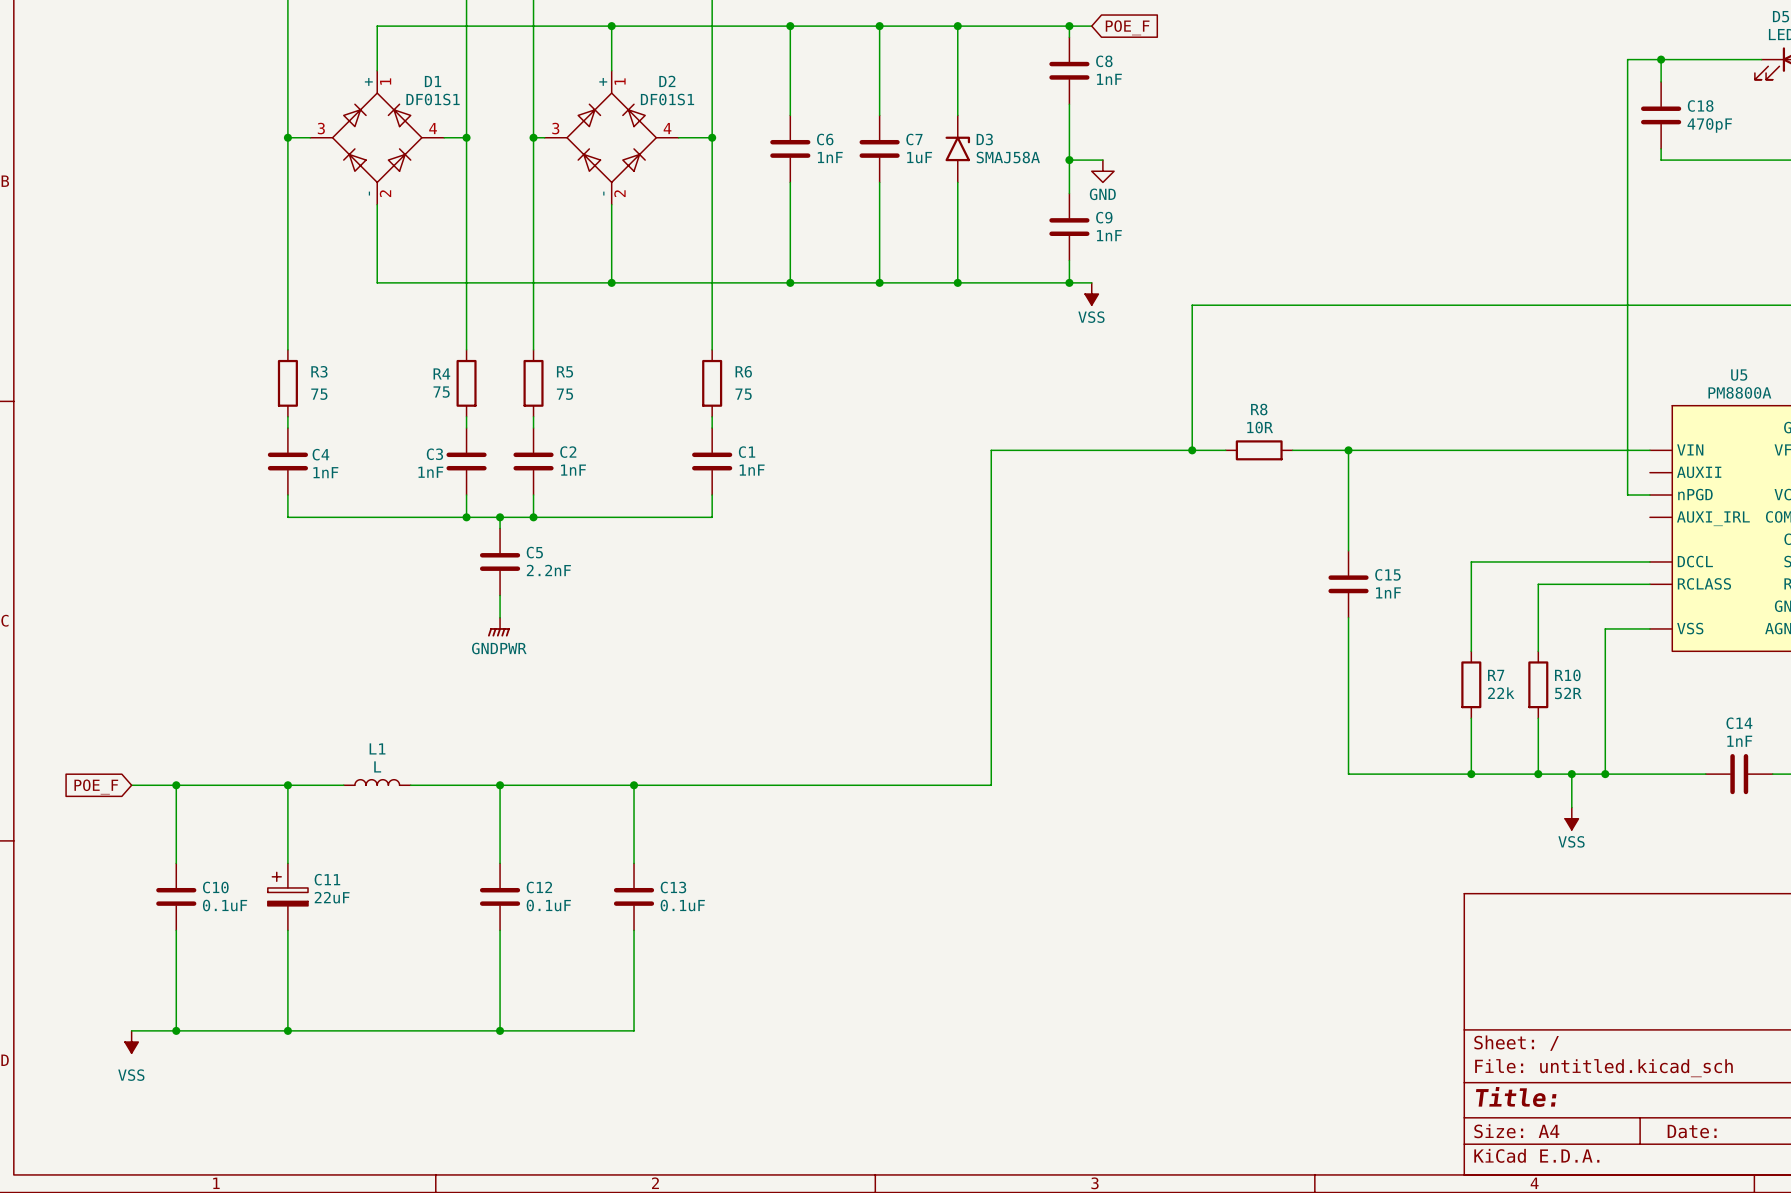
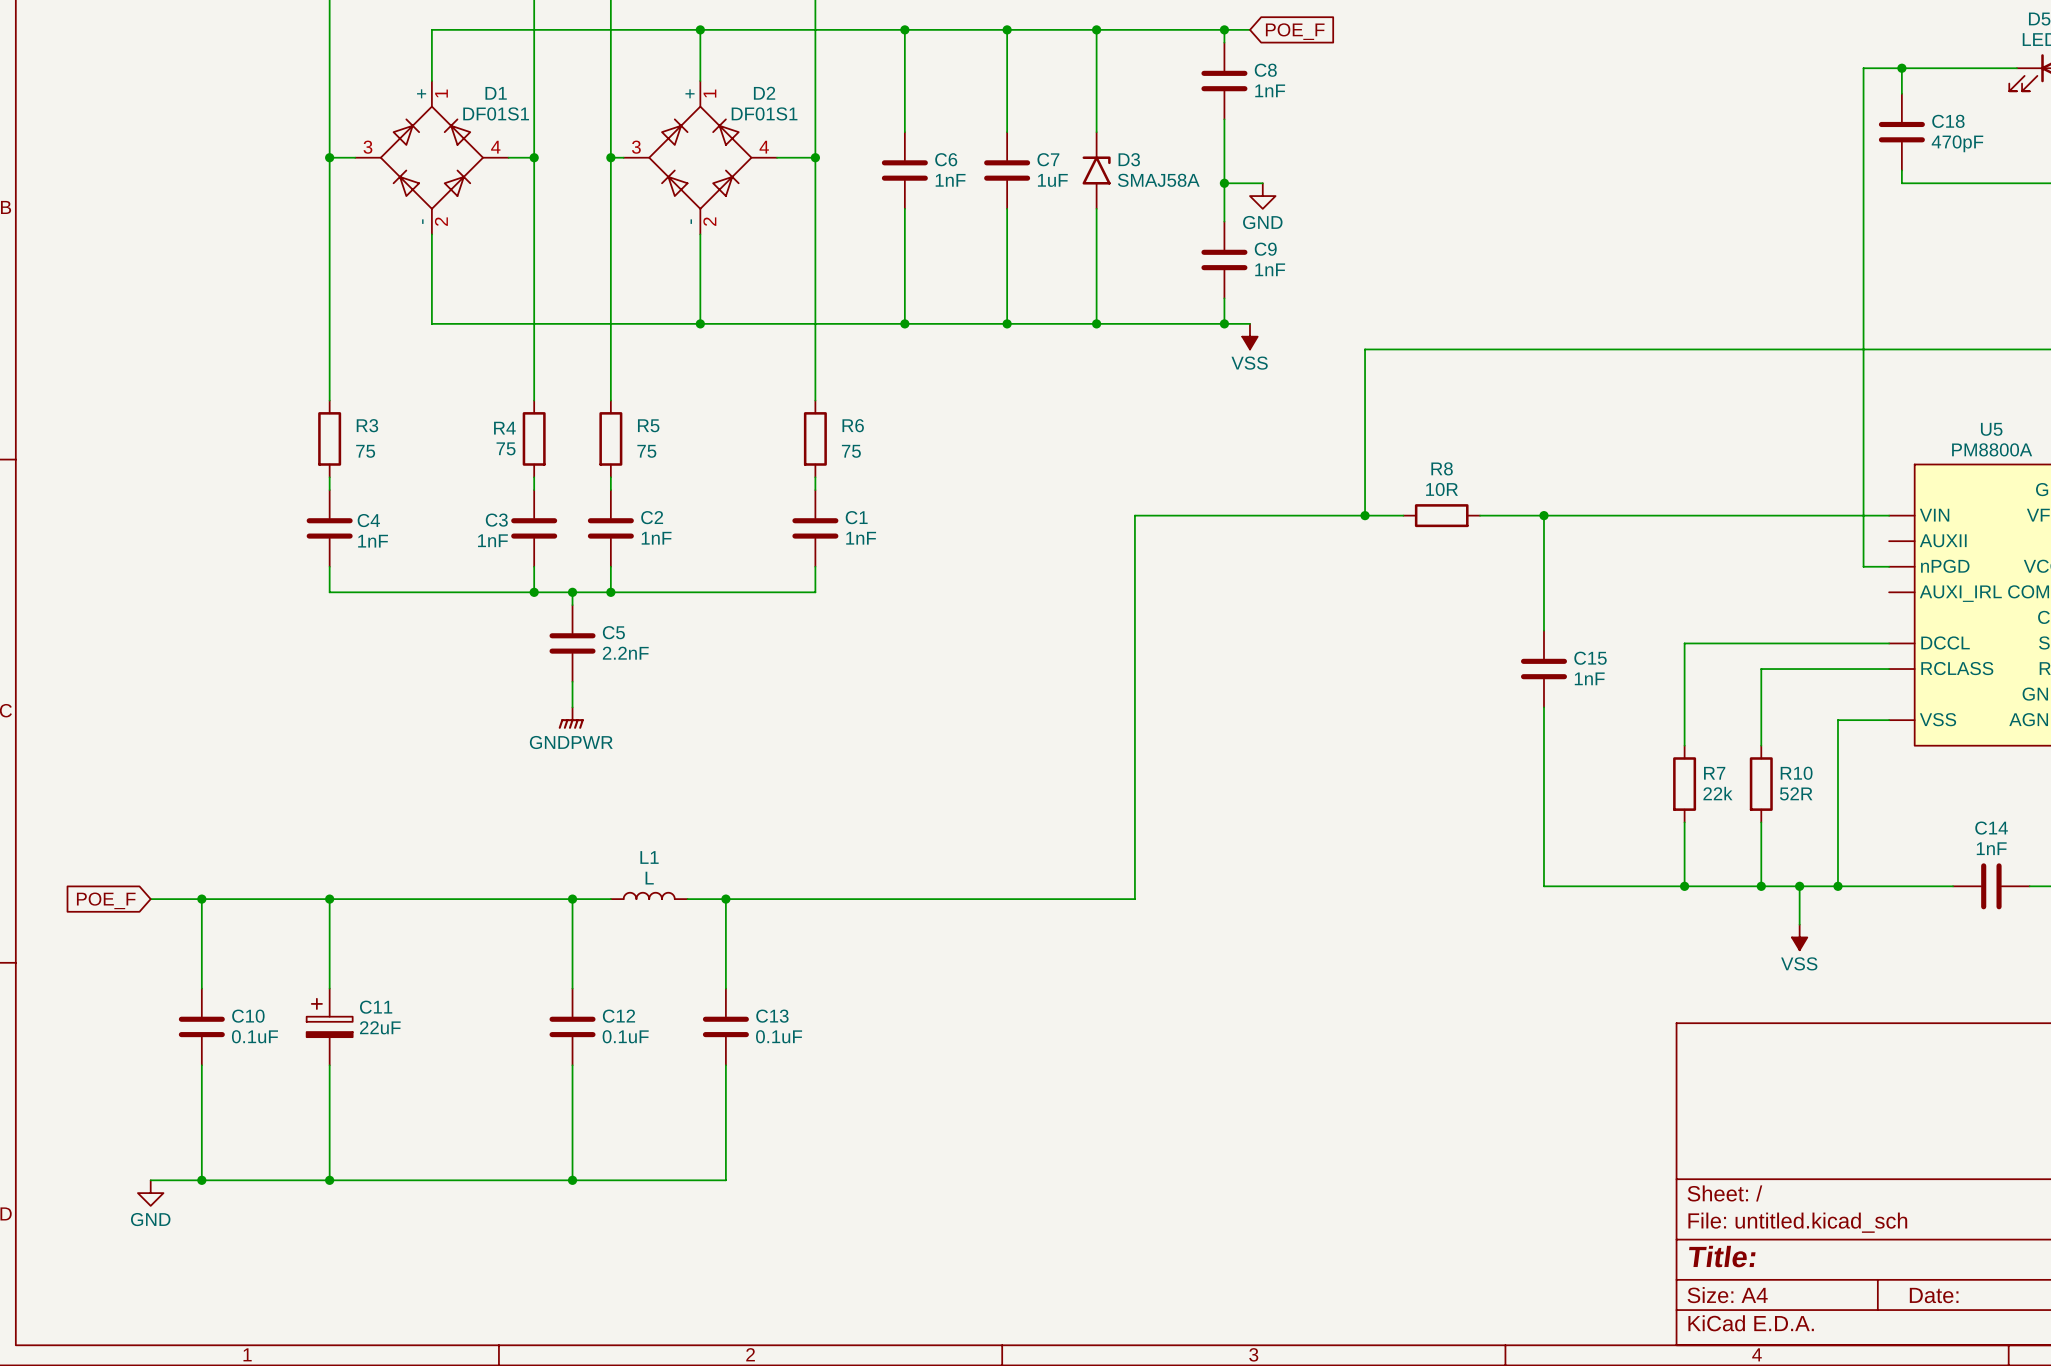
L1 position: (377, 782) -> (649, 895)
wire: (533, 785) (600, 785) -> (393, 899) (470, 899)
power symbol: VSS (131, 1042) -> GND (150, 1193)

